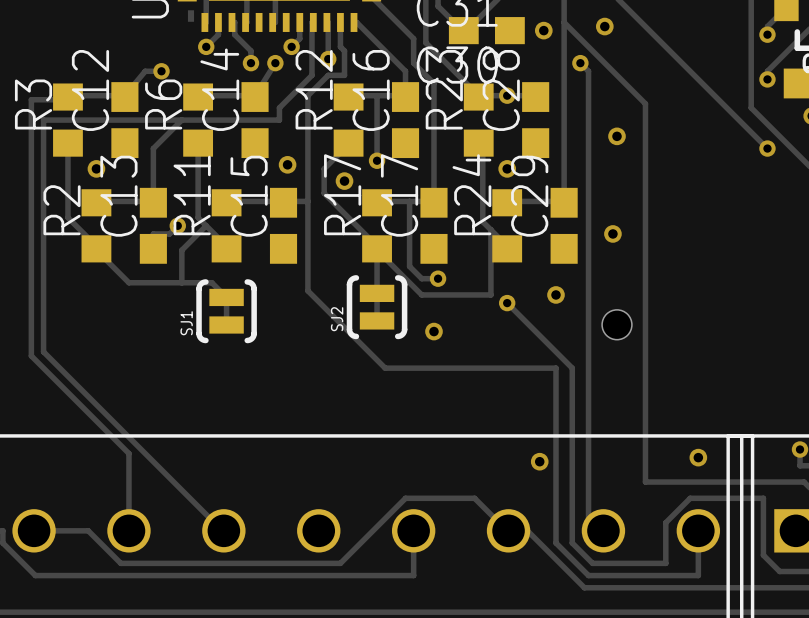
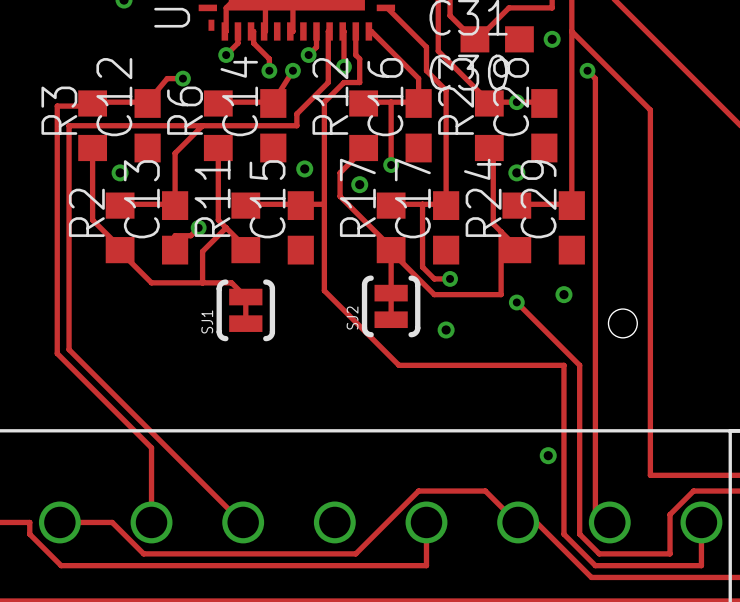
via: (604, 26) -> none
via: (617, 136) -> none
via: (612, 233) -> none
via: (698, 457) -> none

